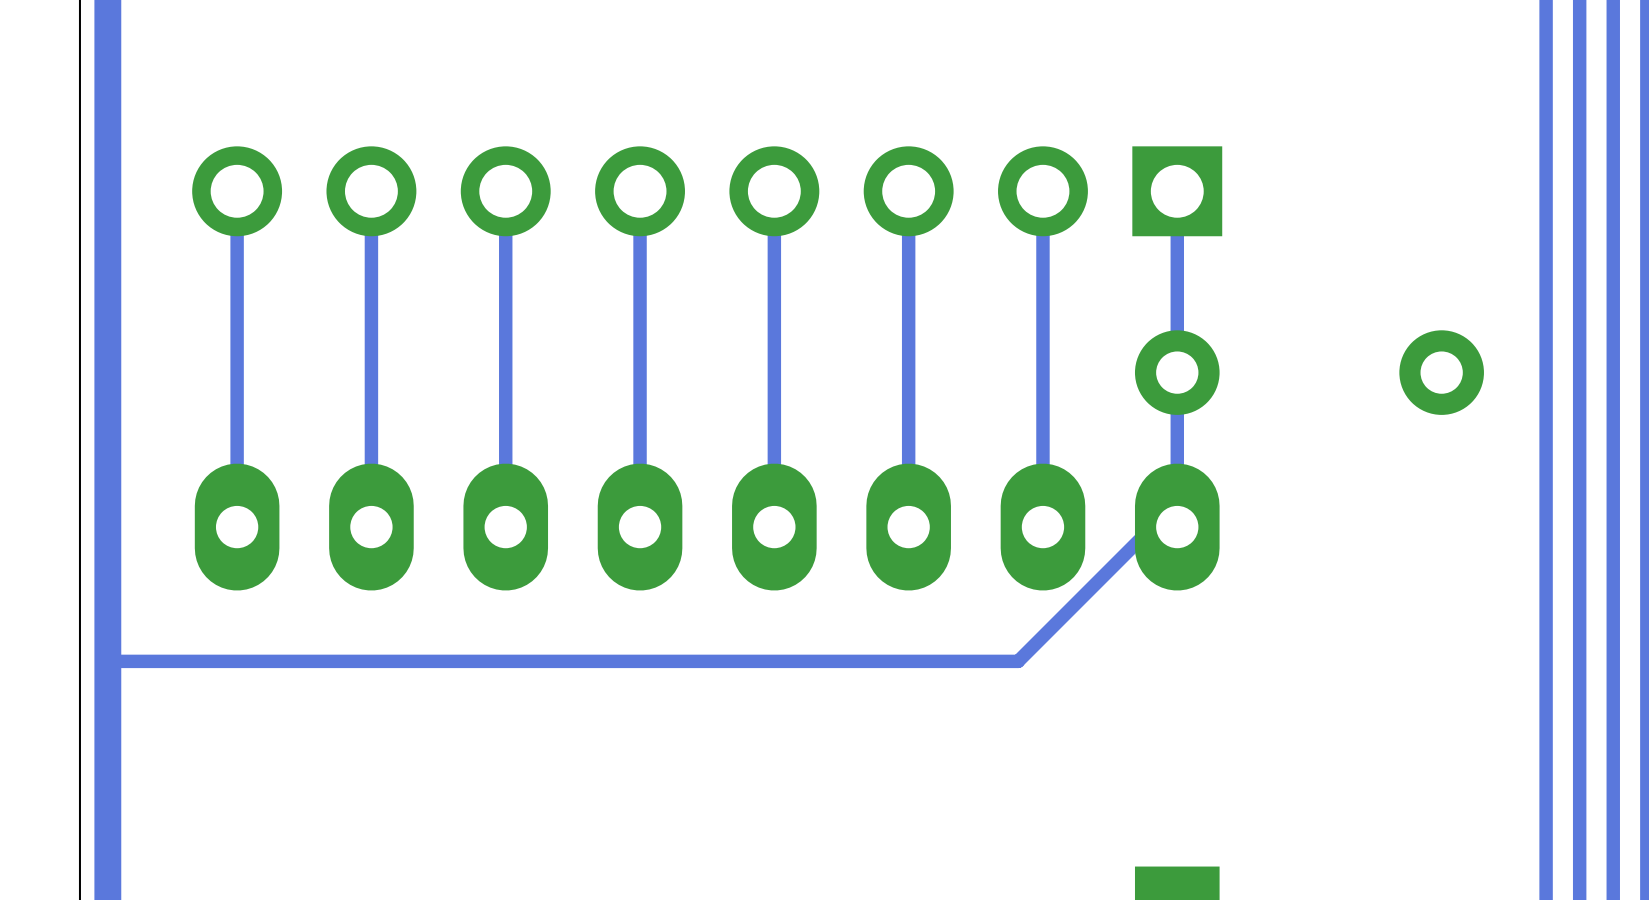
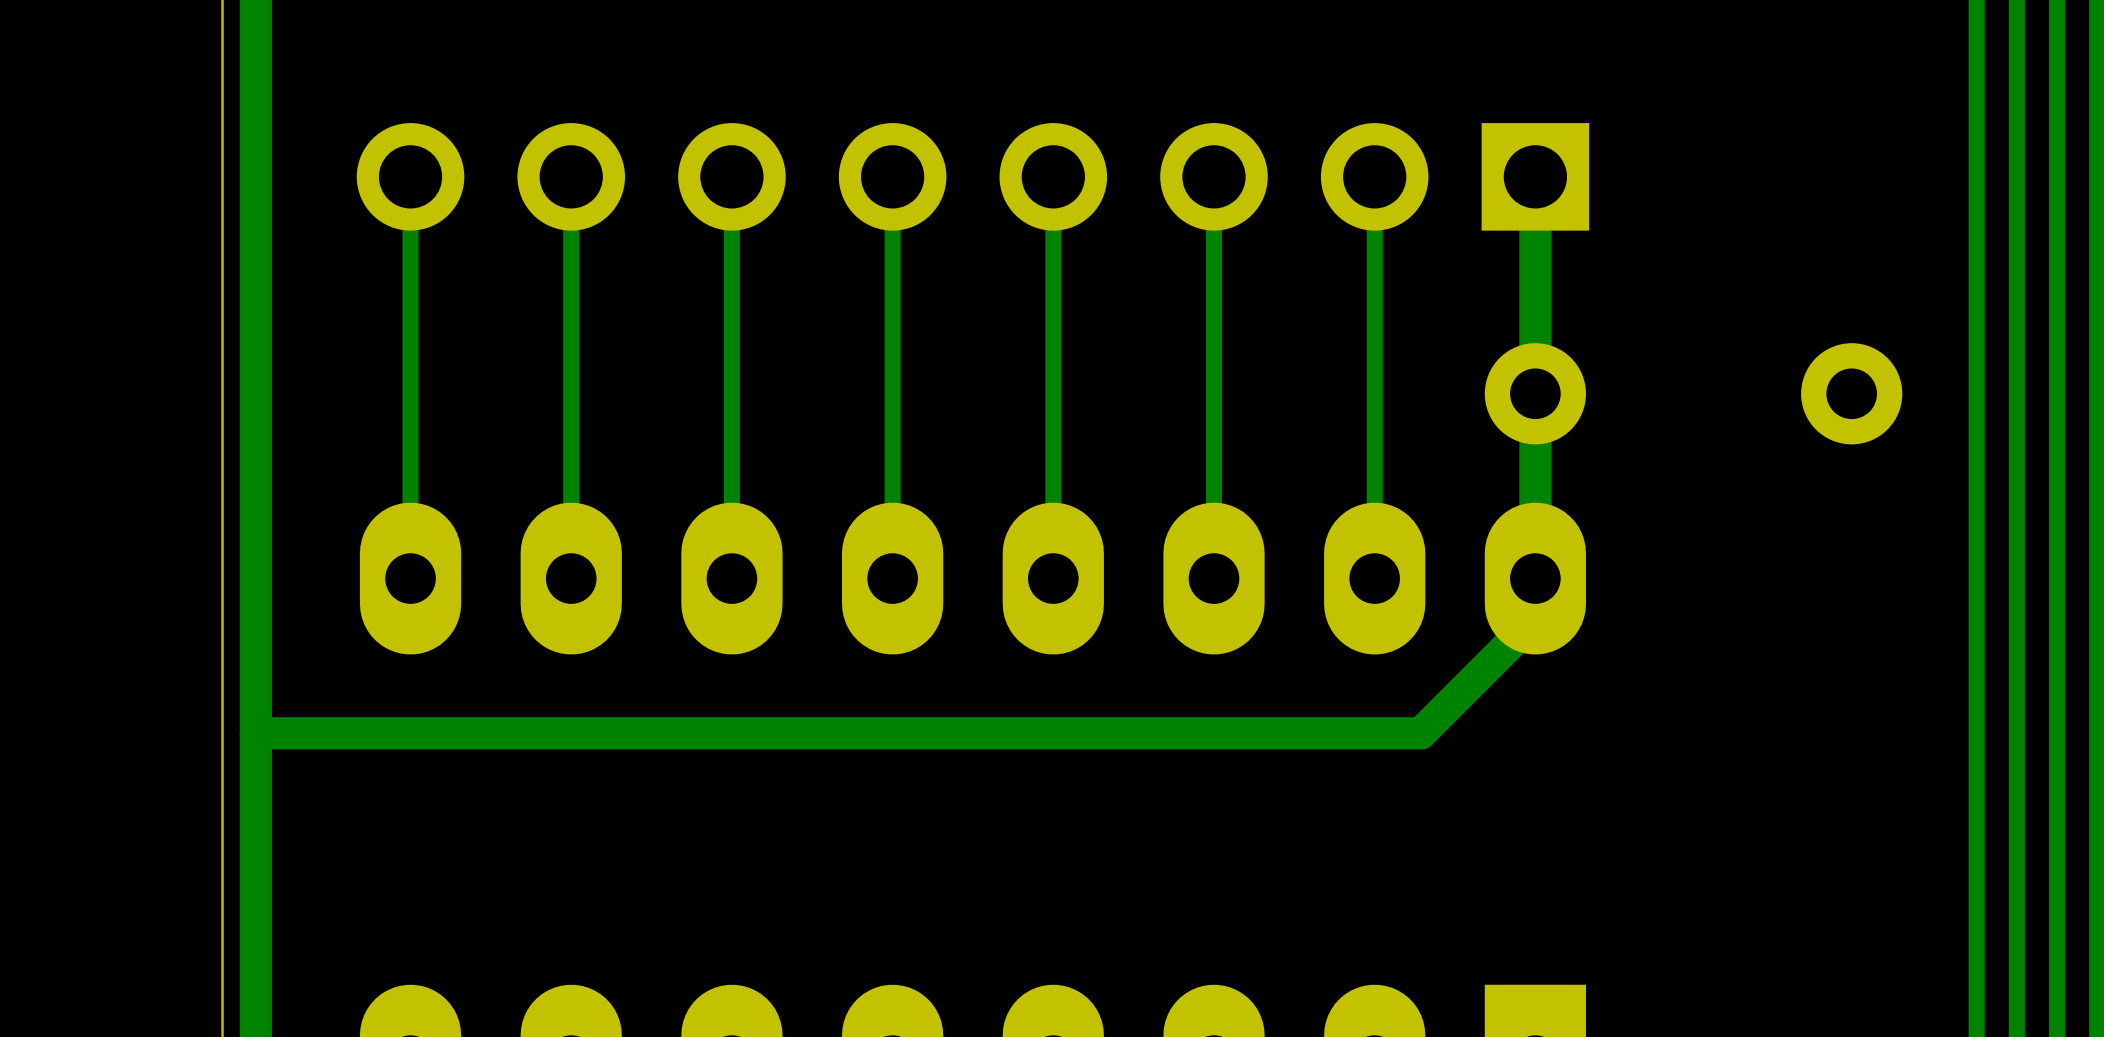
track width: thin (1177, 191) (1177, 502) -> thick (1535, 176) (1535, 548)
track: (1177, 502) (1018, 661) (105, 661) -> (1535, 548) (1535, 618) (1420, 733) (255, 733)

